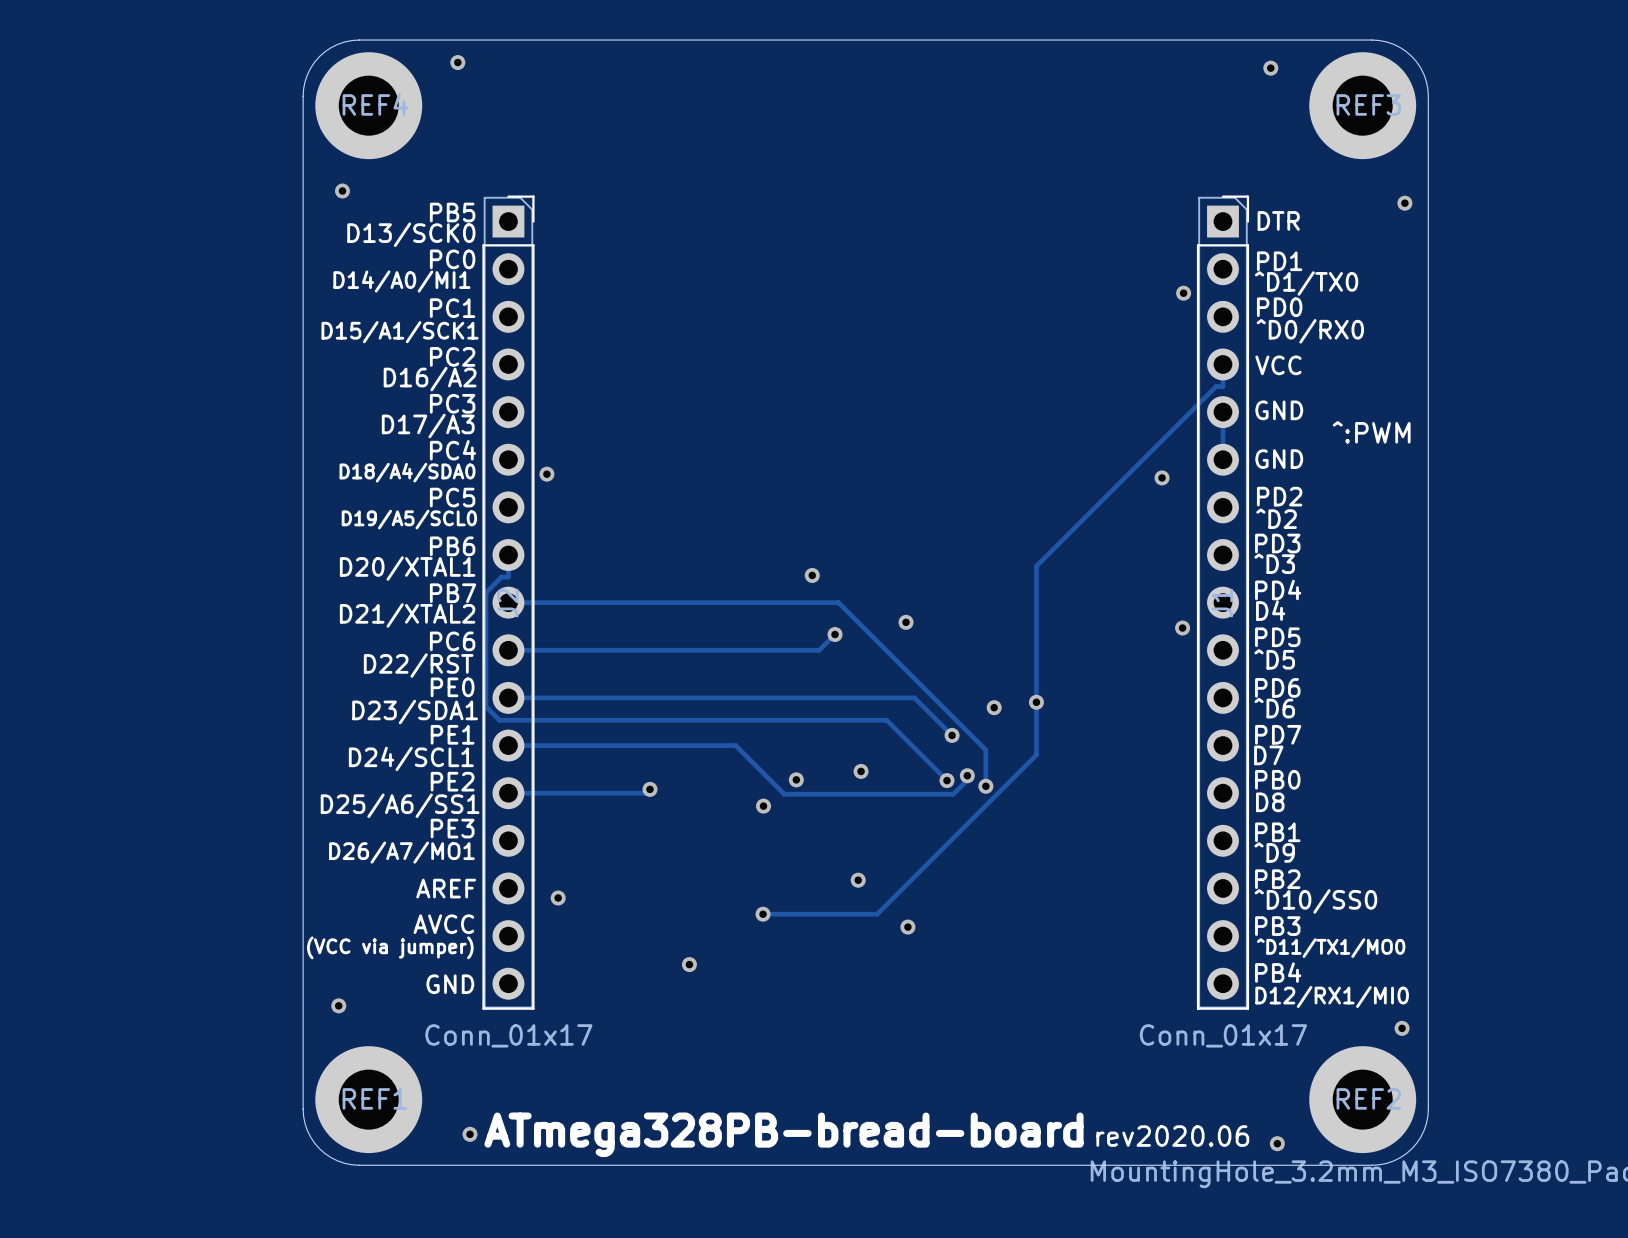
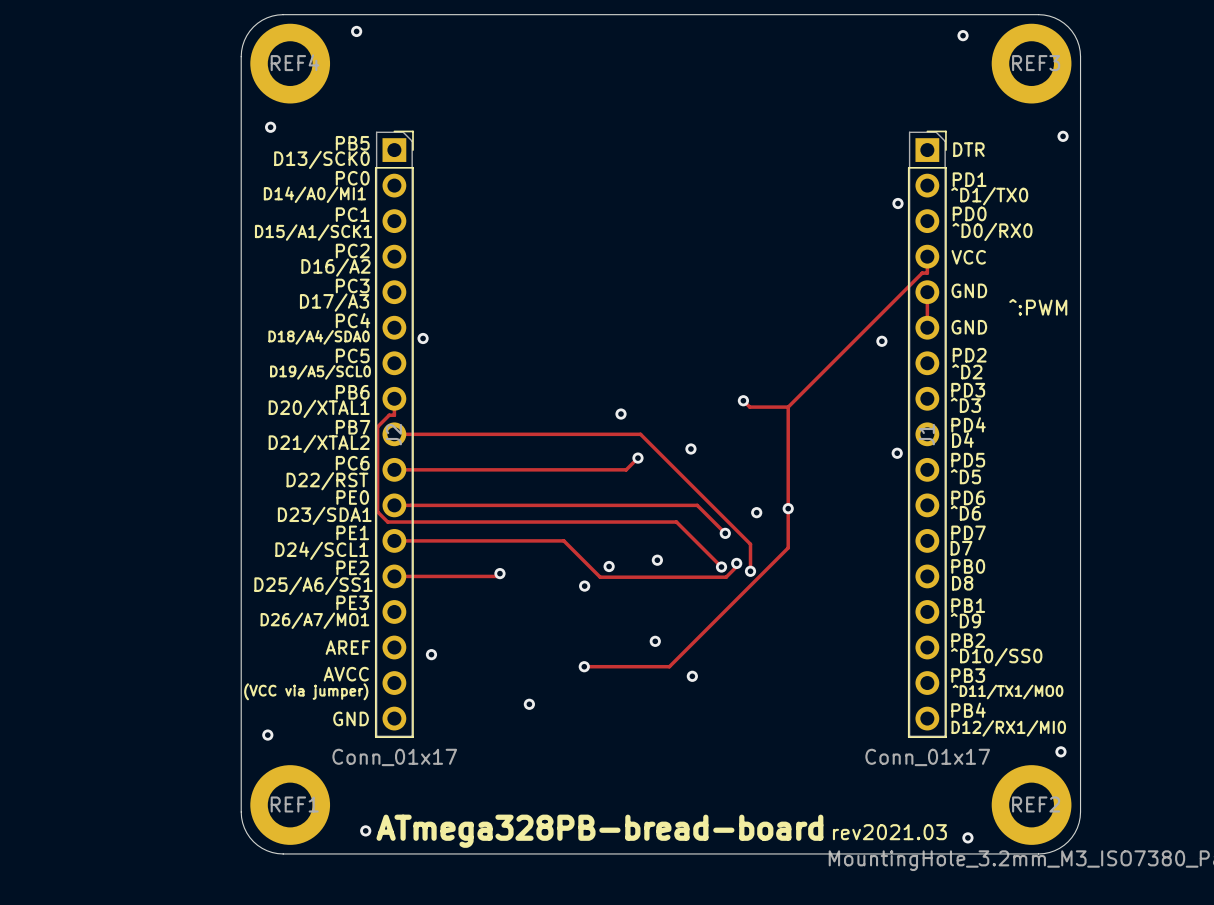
track: none -> (743, 400) (749, 407) (788, 407)
via: none -> (743, 400)
text: rev2020.06 (1172, 1136) -> rev2021.03 (889, 832)

